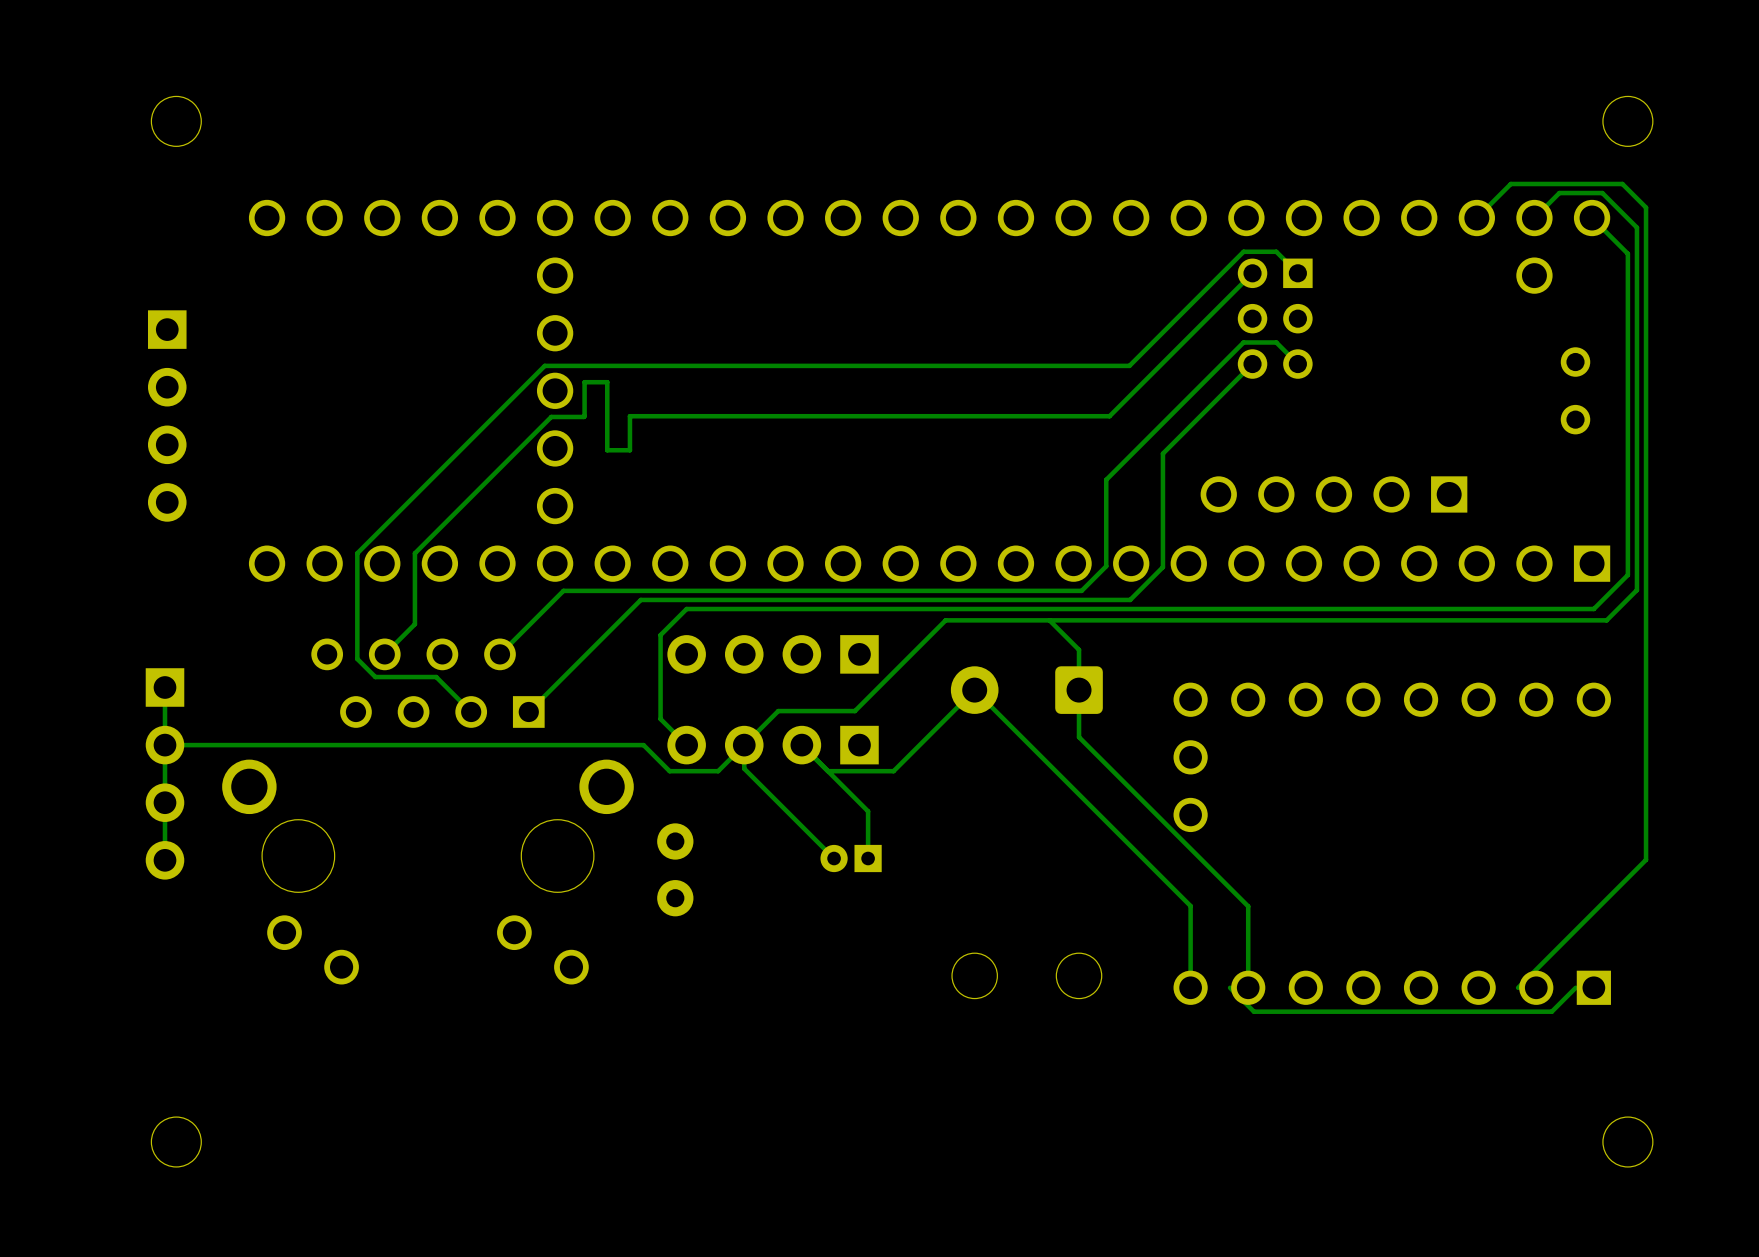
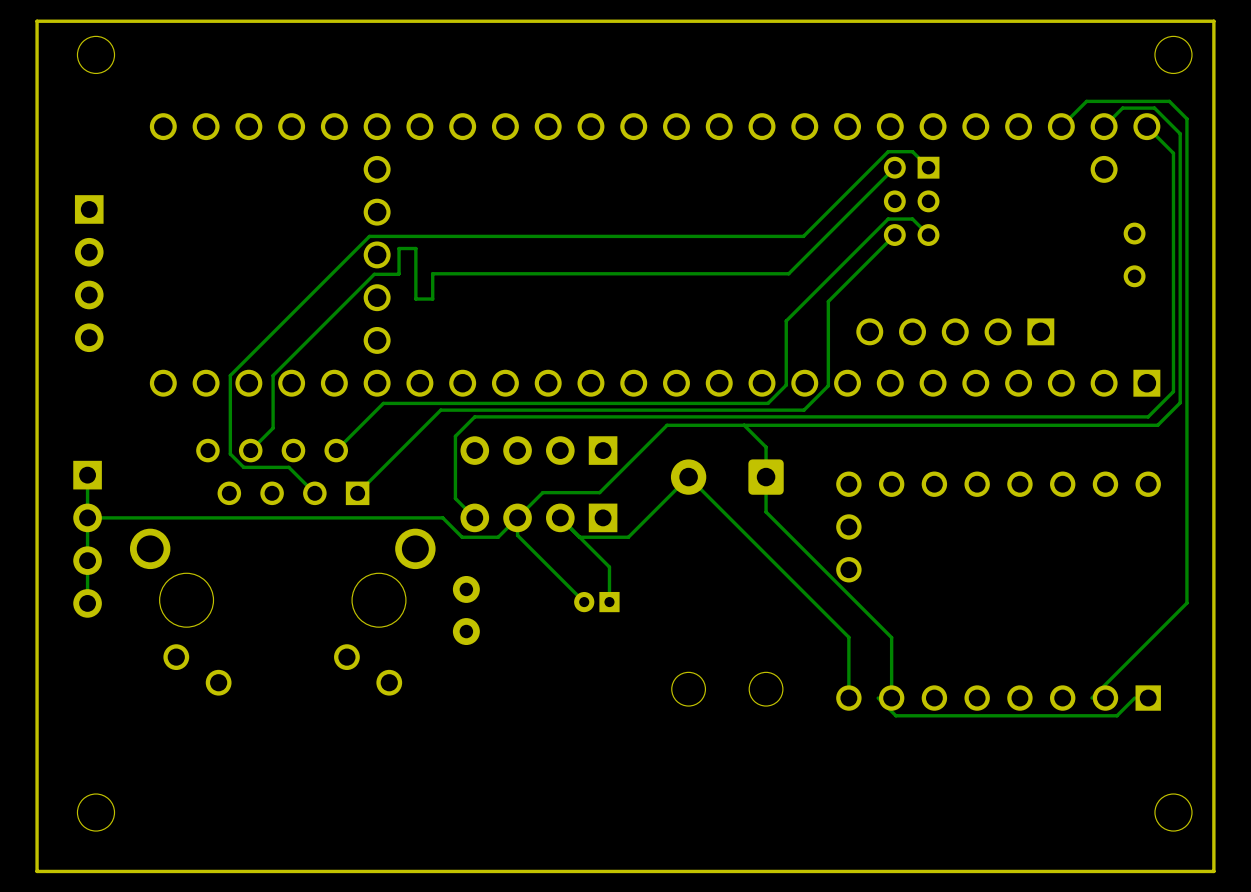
board edge: none -> (1213, 21) (37, 21) (37, 871) (1213, 871) (1213, 21)

